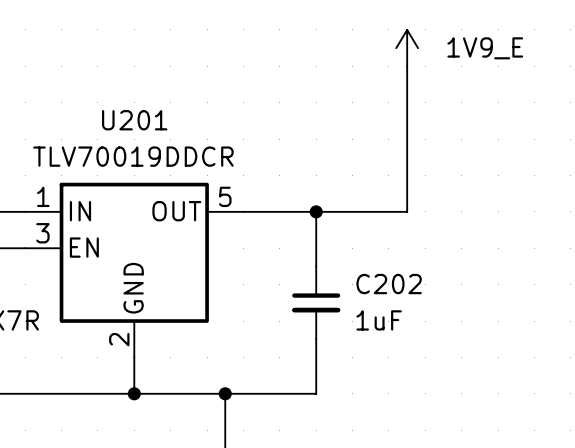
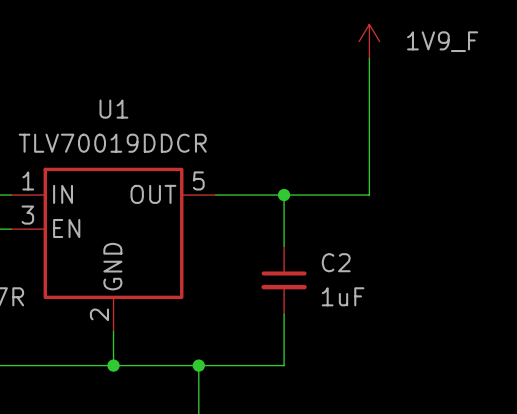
power symbol: 1V9_E (407, 48) -> 1V9_F (369, 41)
U201 name: U201 (134, 120) -> U1 (113, 109)
C202 name: C202 (389, 284) -> C2 (336, 262)

